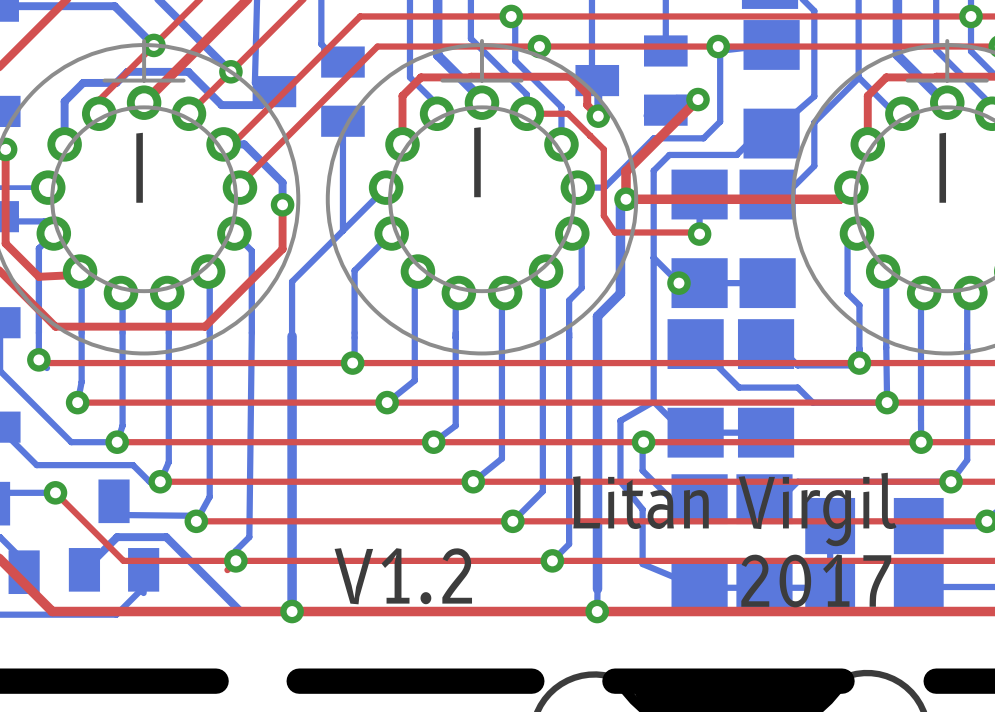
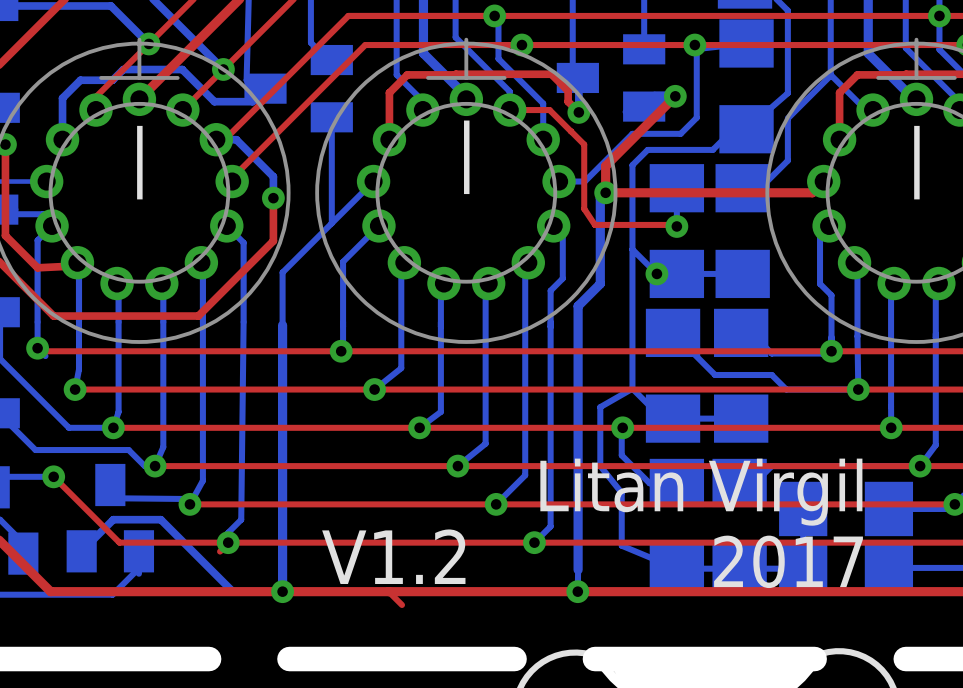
top track: none -> (388, 591) (402, 605)

